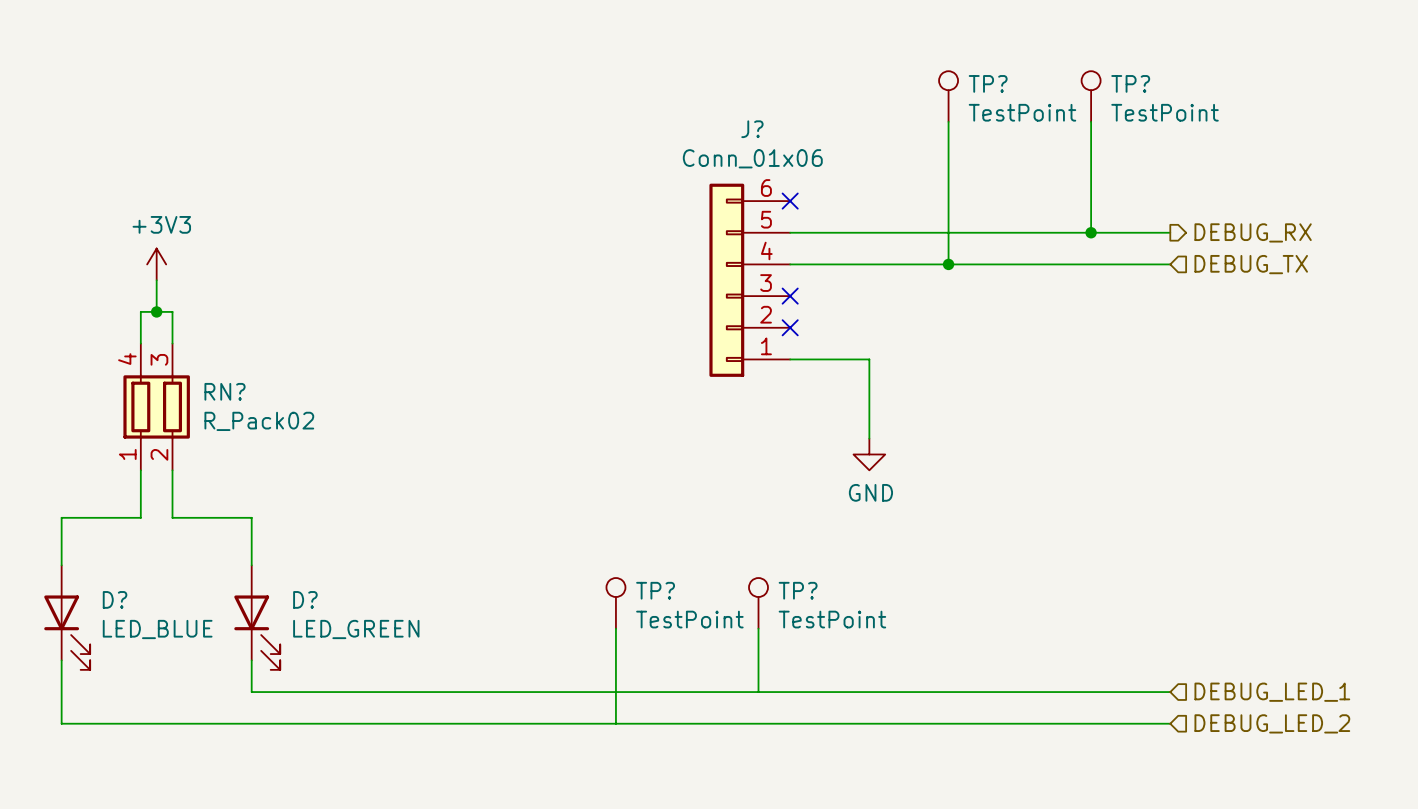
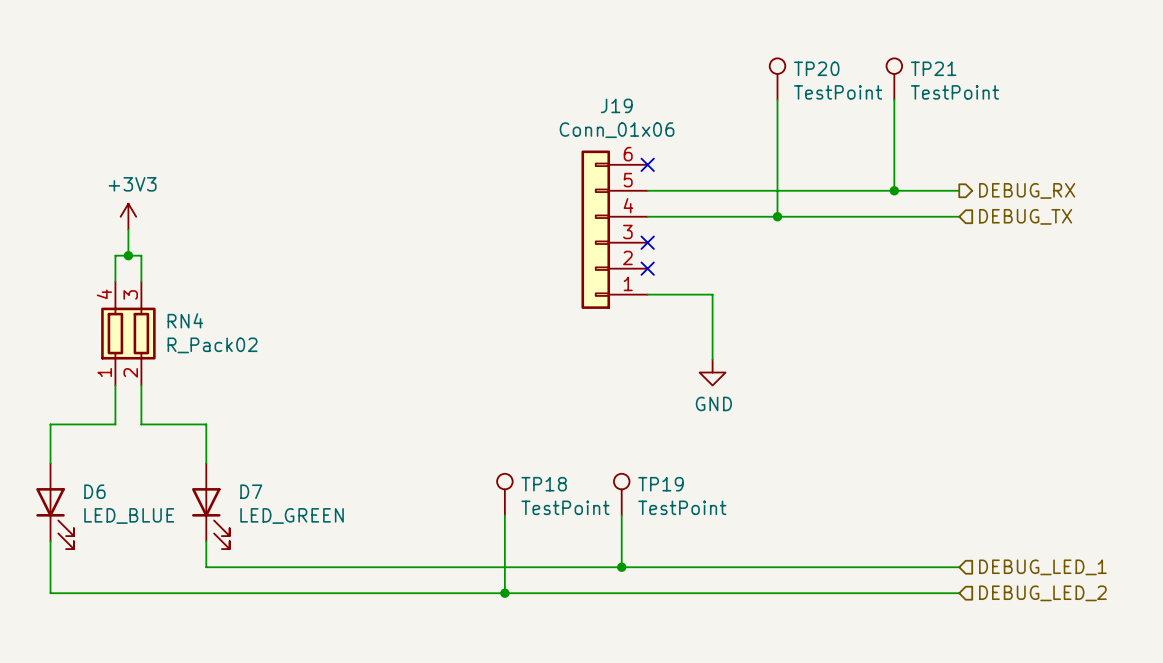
TP? name: TP? (988, 83) -> TP20 (816, 68)
TP? name: TP? (1130, 83) -> TP21 (933, 68)
J? name: J? (752, 129) -> J19 (616, 105)
RN? name: RN? (225, 391) -> RN4 (185, 320)
TP? name: TP? (655, 590) -> TP18 (544, 484)
TP? name: TP? (798, 590) -> TP19 (660, 484)
D? name: D? (115, 599) -> D6 (94, 491)
D? name: D? (305, 599) -> D7 (251, 491)
junction: none -> (621, 567)
junction: none -> (504, 593)

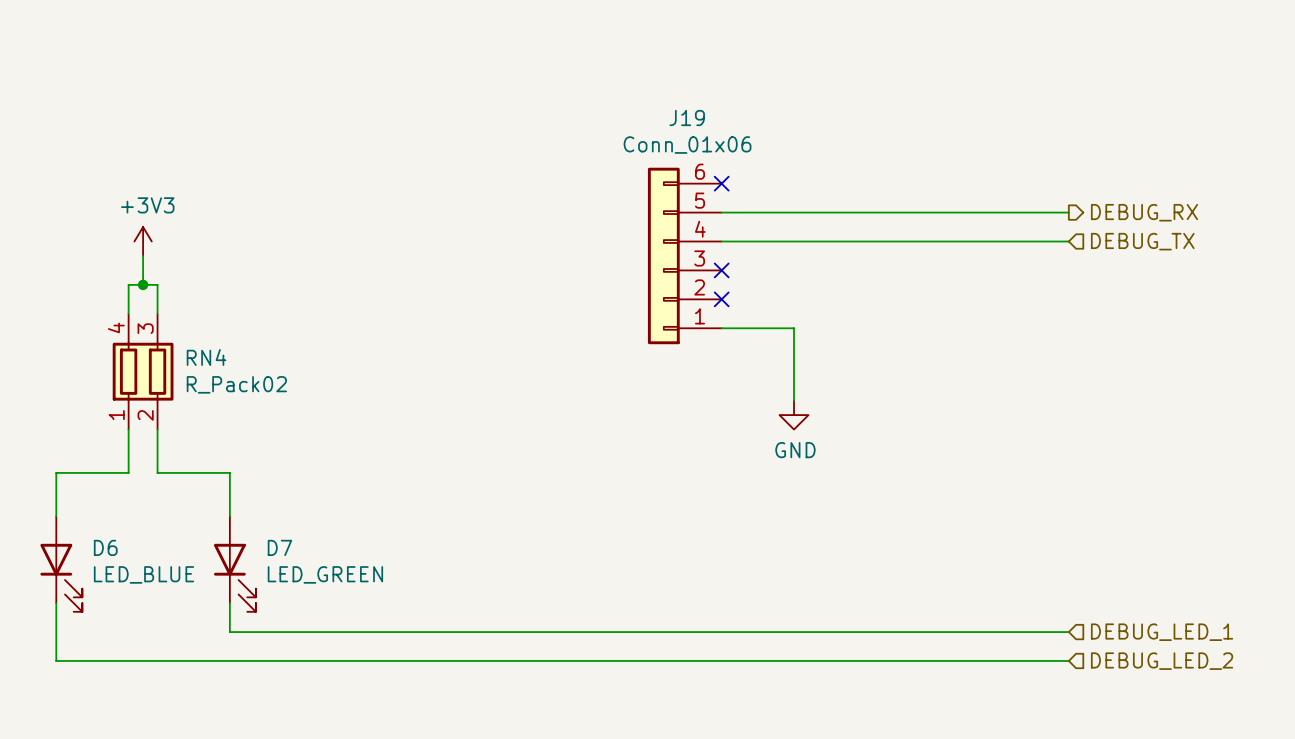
TP20: TestPoint (777, 79) -> none
TP21: TestPoint (894, 79) -> none
wire: (777, 99) (777, 216) -> none
wire: (894, 99) (894, 190) -> none
junction: (894, 190) -> none
junction: (777, 216) -> none
TP18: TestPoint (504, 494) -> none
TP19: TestPoint (621, 494) -> none
wire: (504, 515) (504, 593) -> none
wire: (621, 515) (621, 567) -> none
junction: (621, 567) -> none
junction: (504, 593) -> none

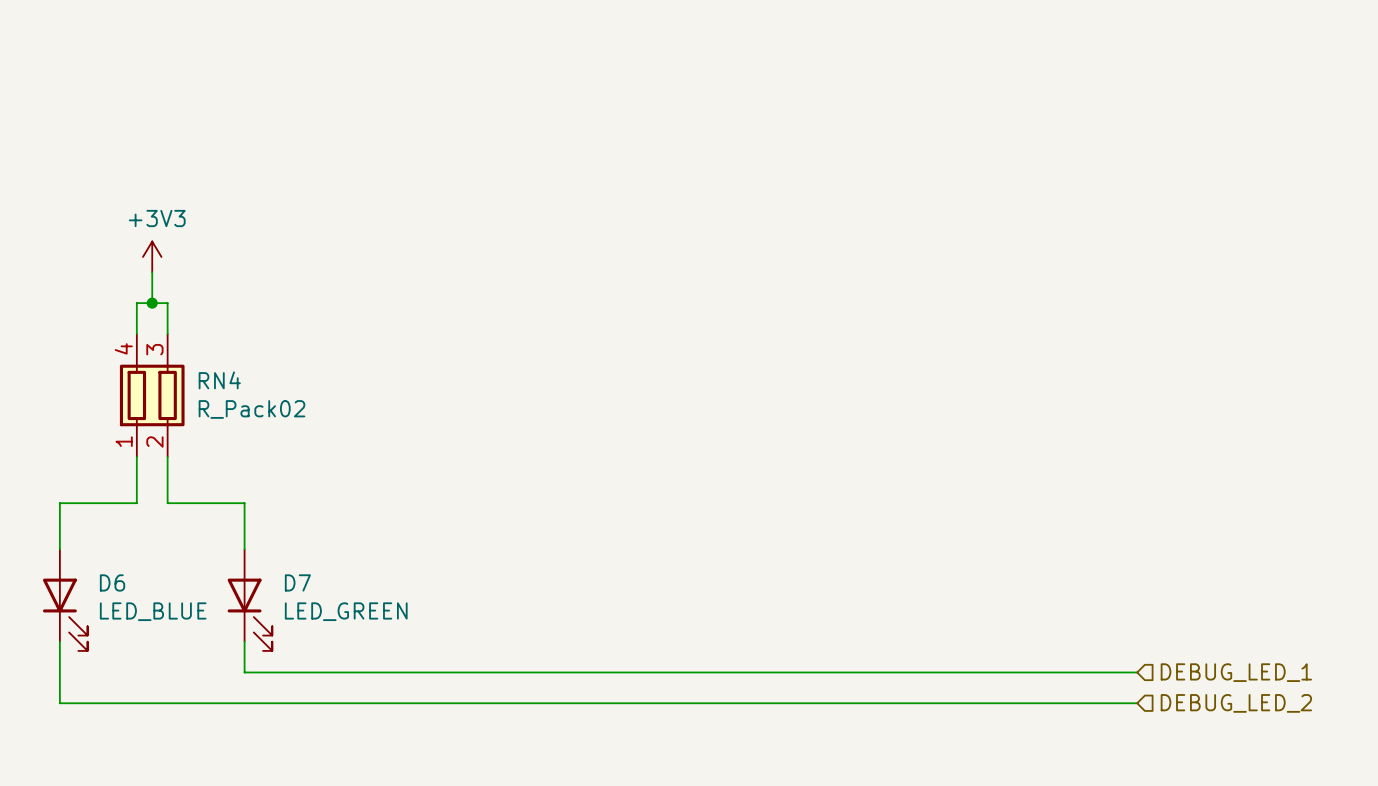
no-connect mark: (721, 183) -> none
wire: (721, 212) (1068, 212) -> none
hierarchical label: DEBUG_RX (1144, 212) -> none
wire: (721, 241) (1068, 241) -> none
hierarchical label: DEBUG_TX (1142, 241) -> none
J19: Conn_01x06 (684, 255) -> none
no-connect mark: (721, 270) -> none
no-connect mark: (721, 299) -> none
wire: (721, 328) (794, 328) (794, 400) -> none
power symbol: GND (794, 415) -> none

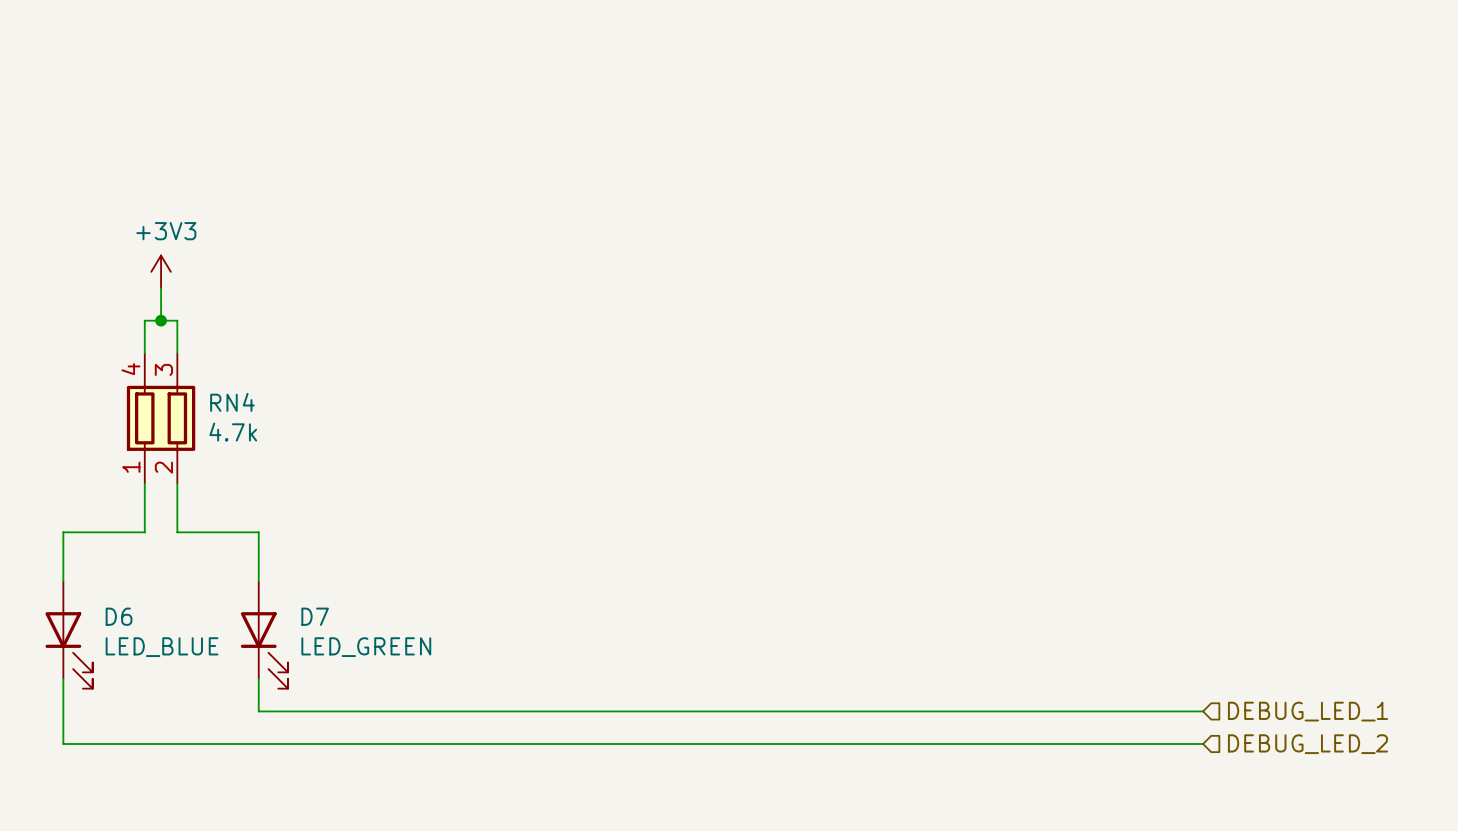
RN4 value: R_Pack02 (251, 409) -> 4.7k (233, 432)

